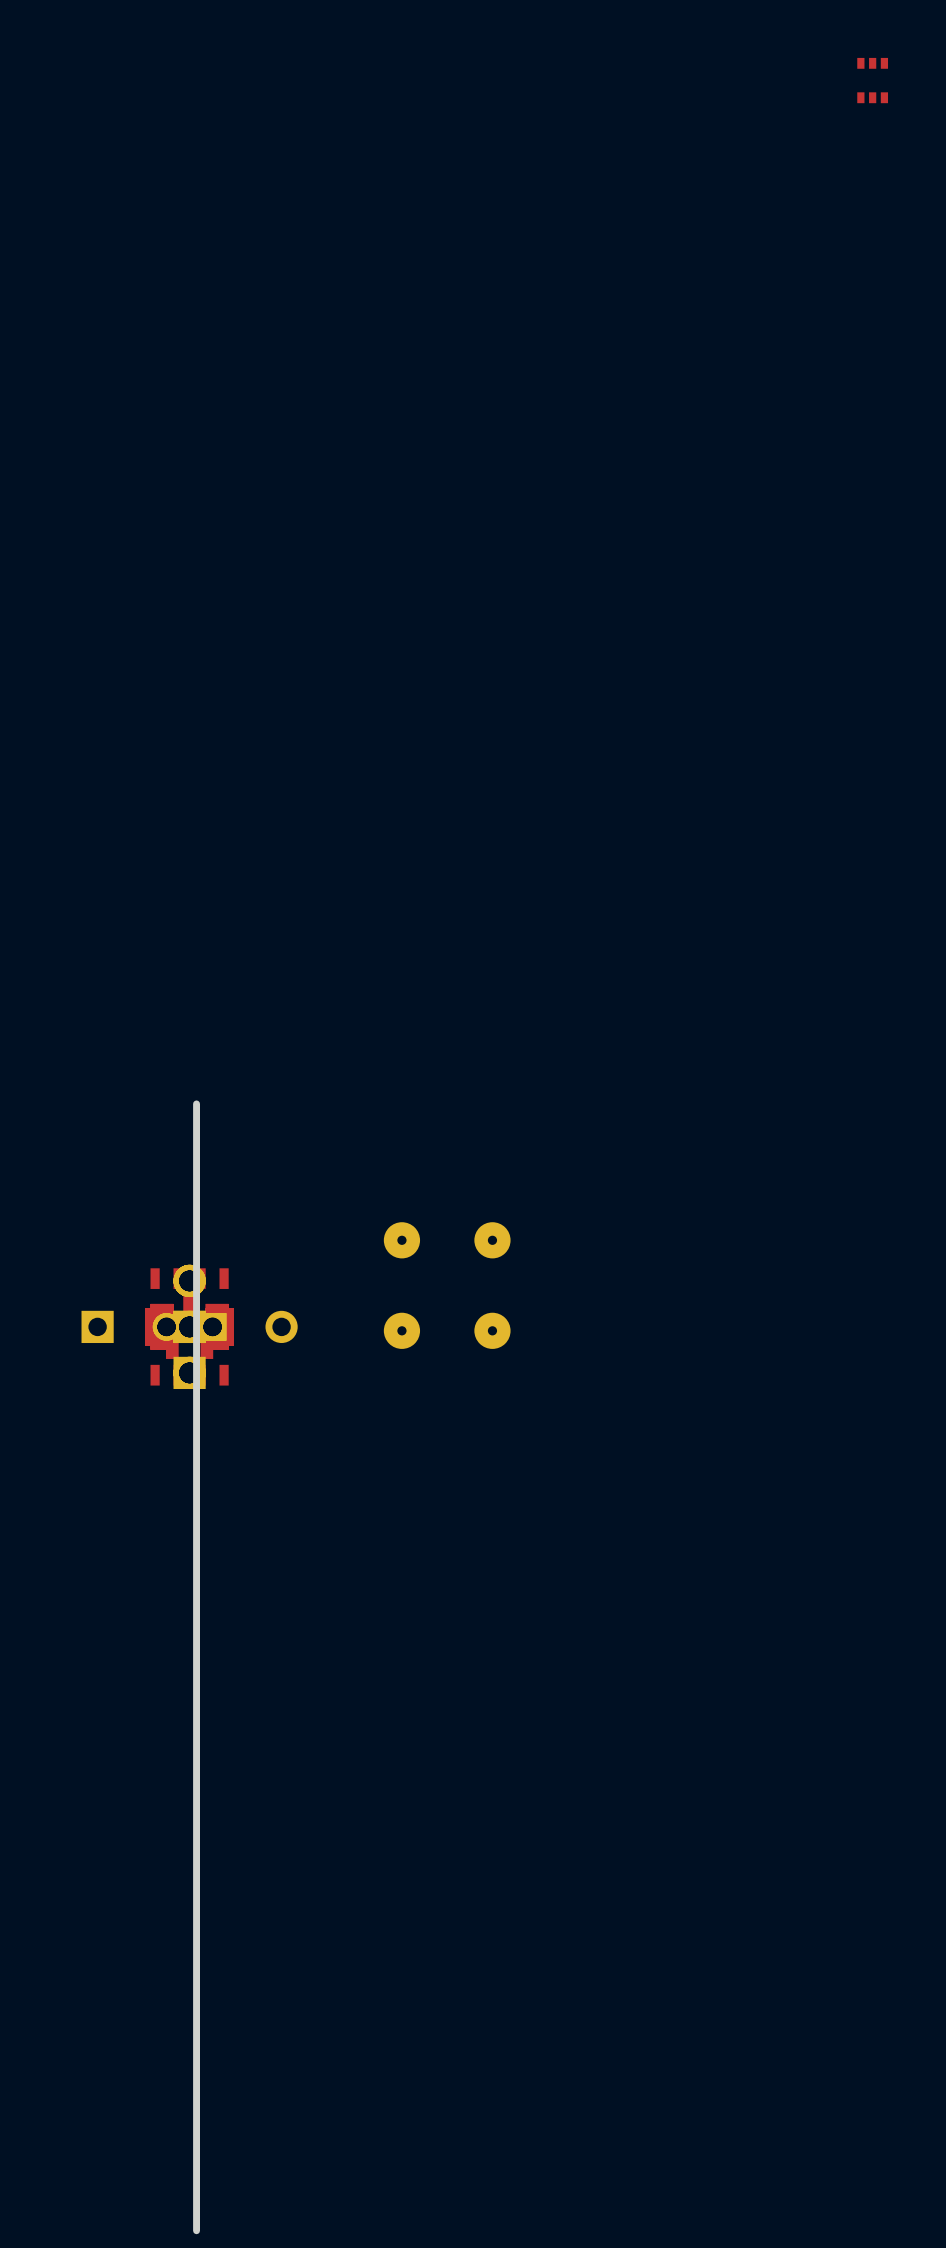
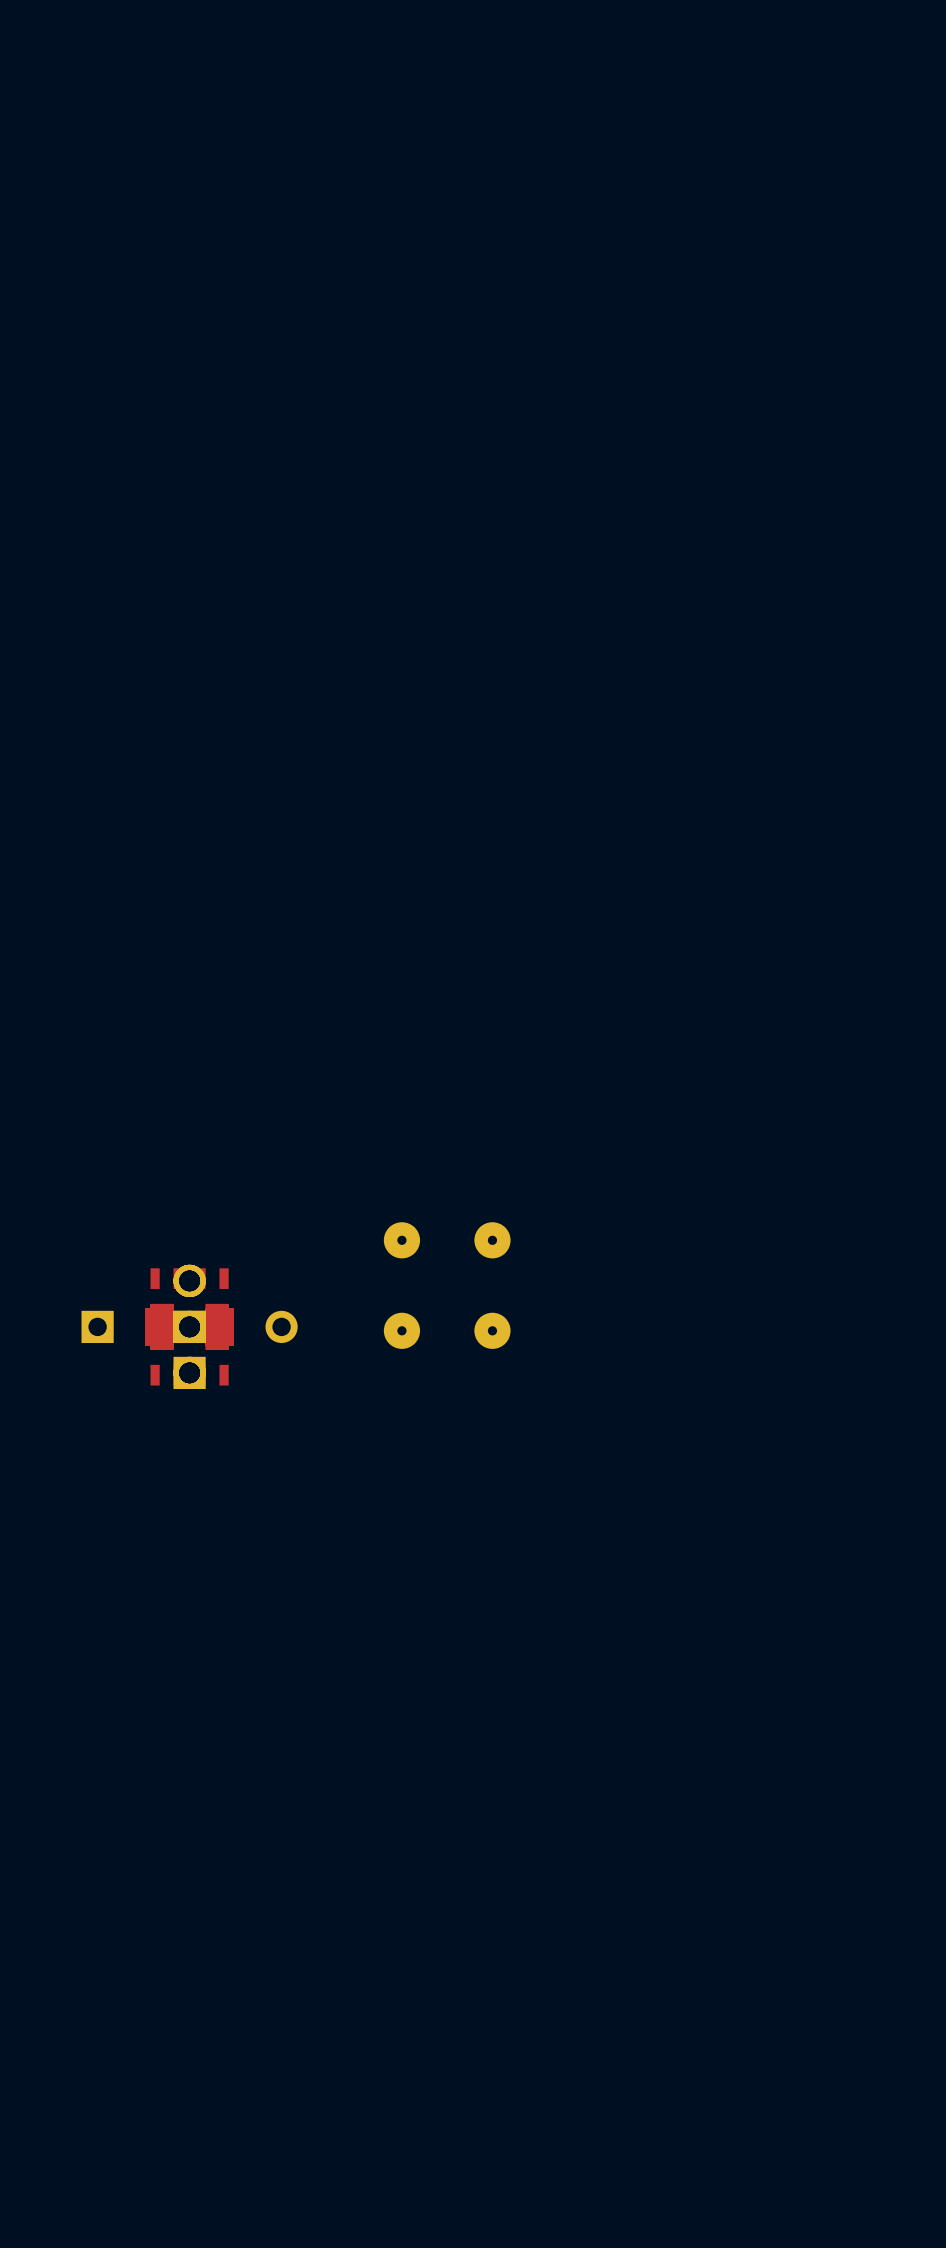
part: (872, 80) -> none
board edge: (196, 1103) (196, 2230) -> none
part: (189, 1326) -> none
part: (189, 1326) -> none

